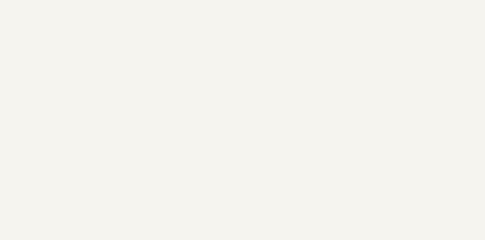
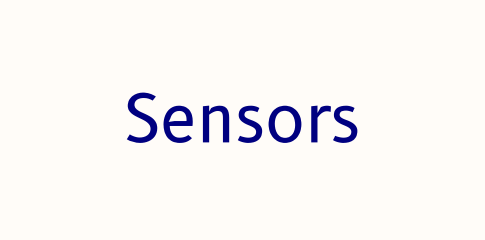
text: none -> Sensors (242, 117)

